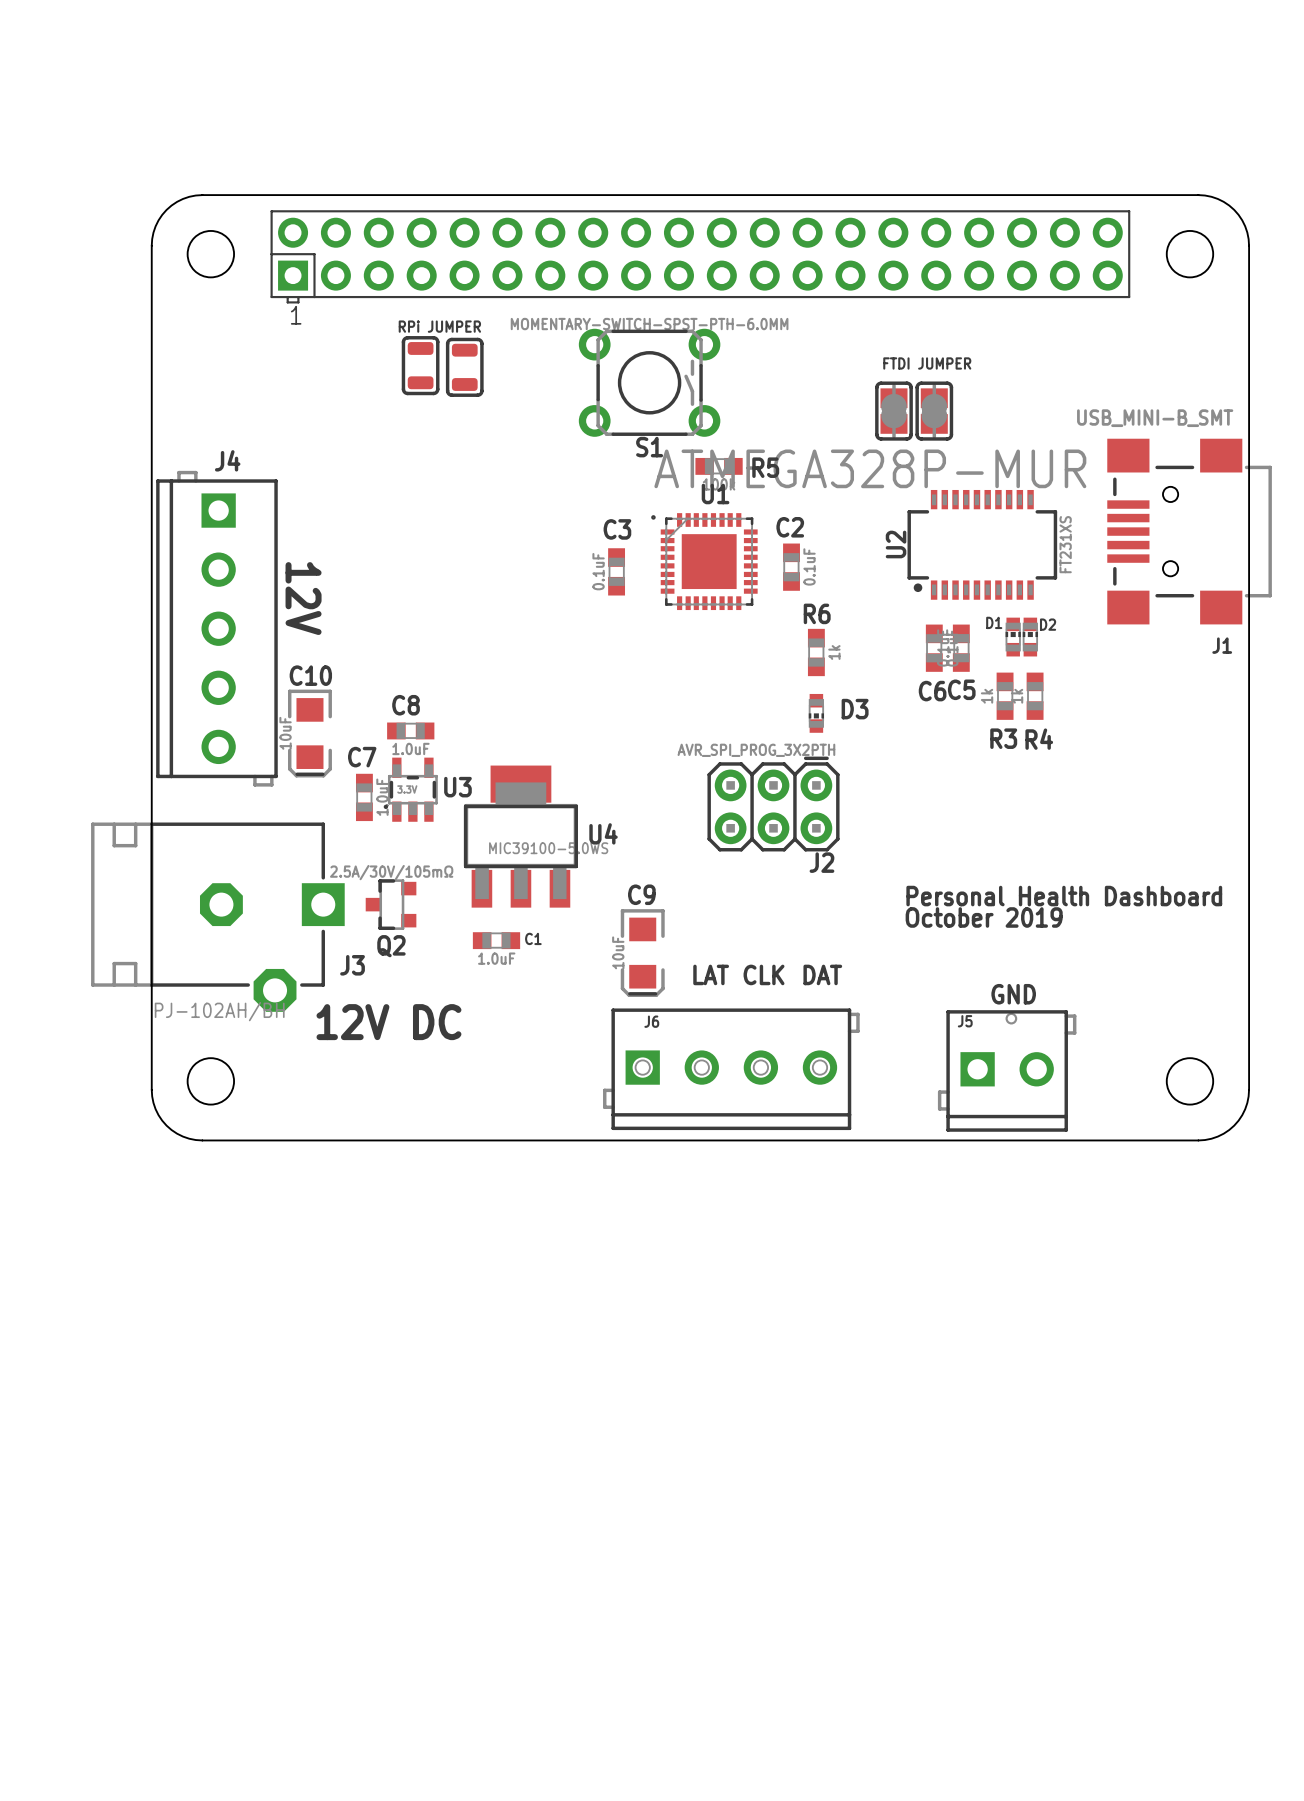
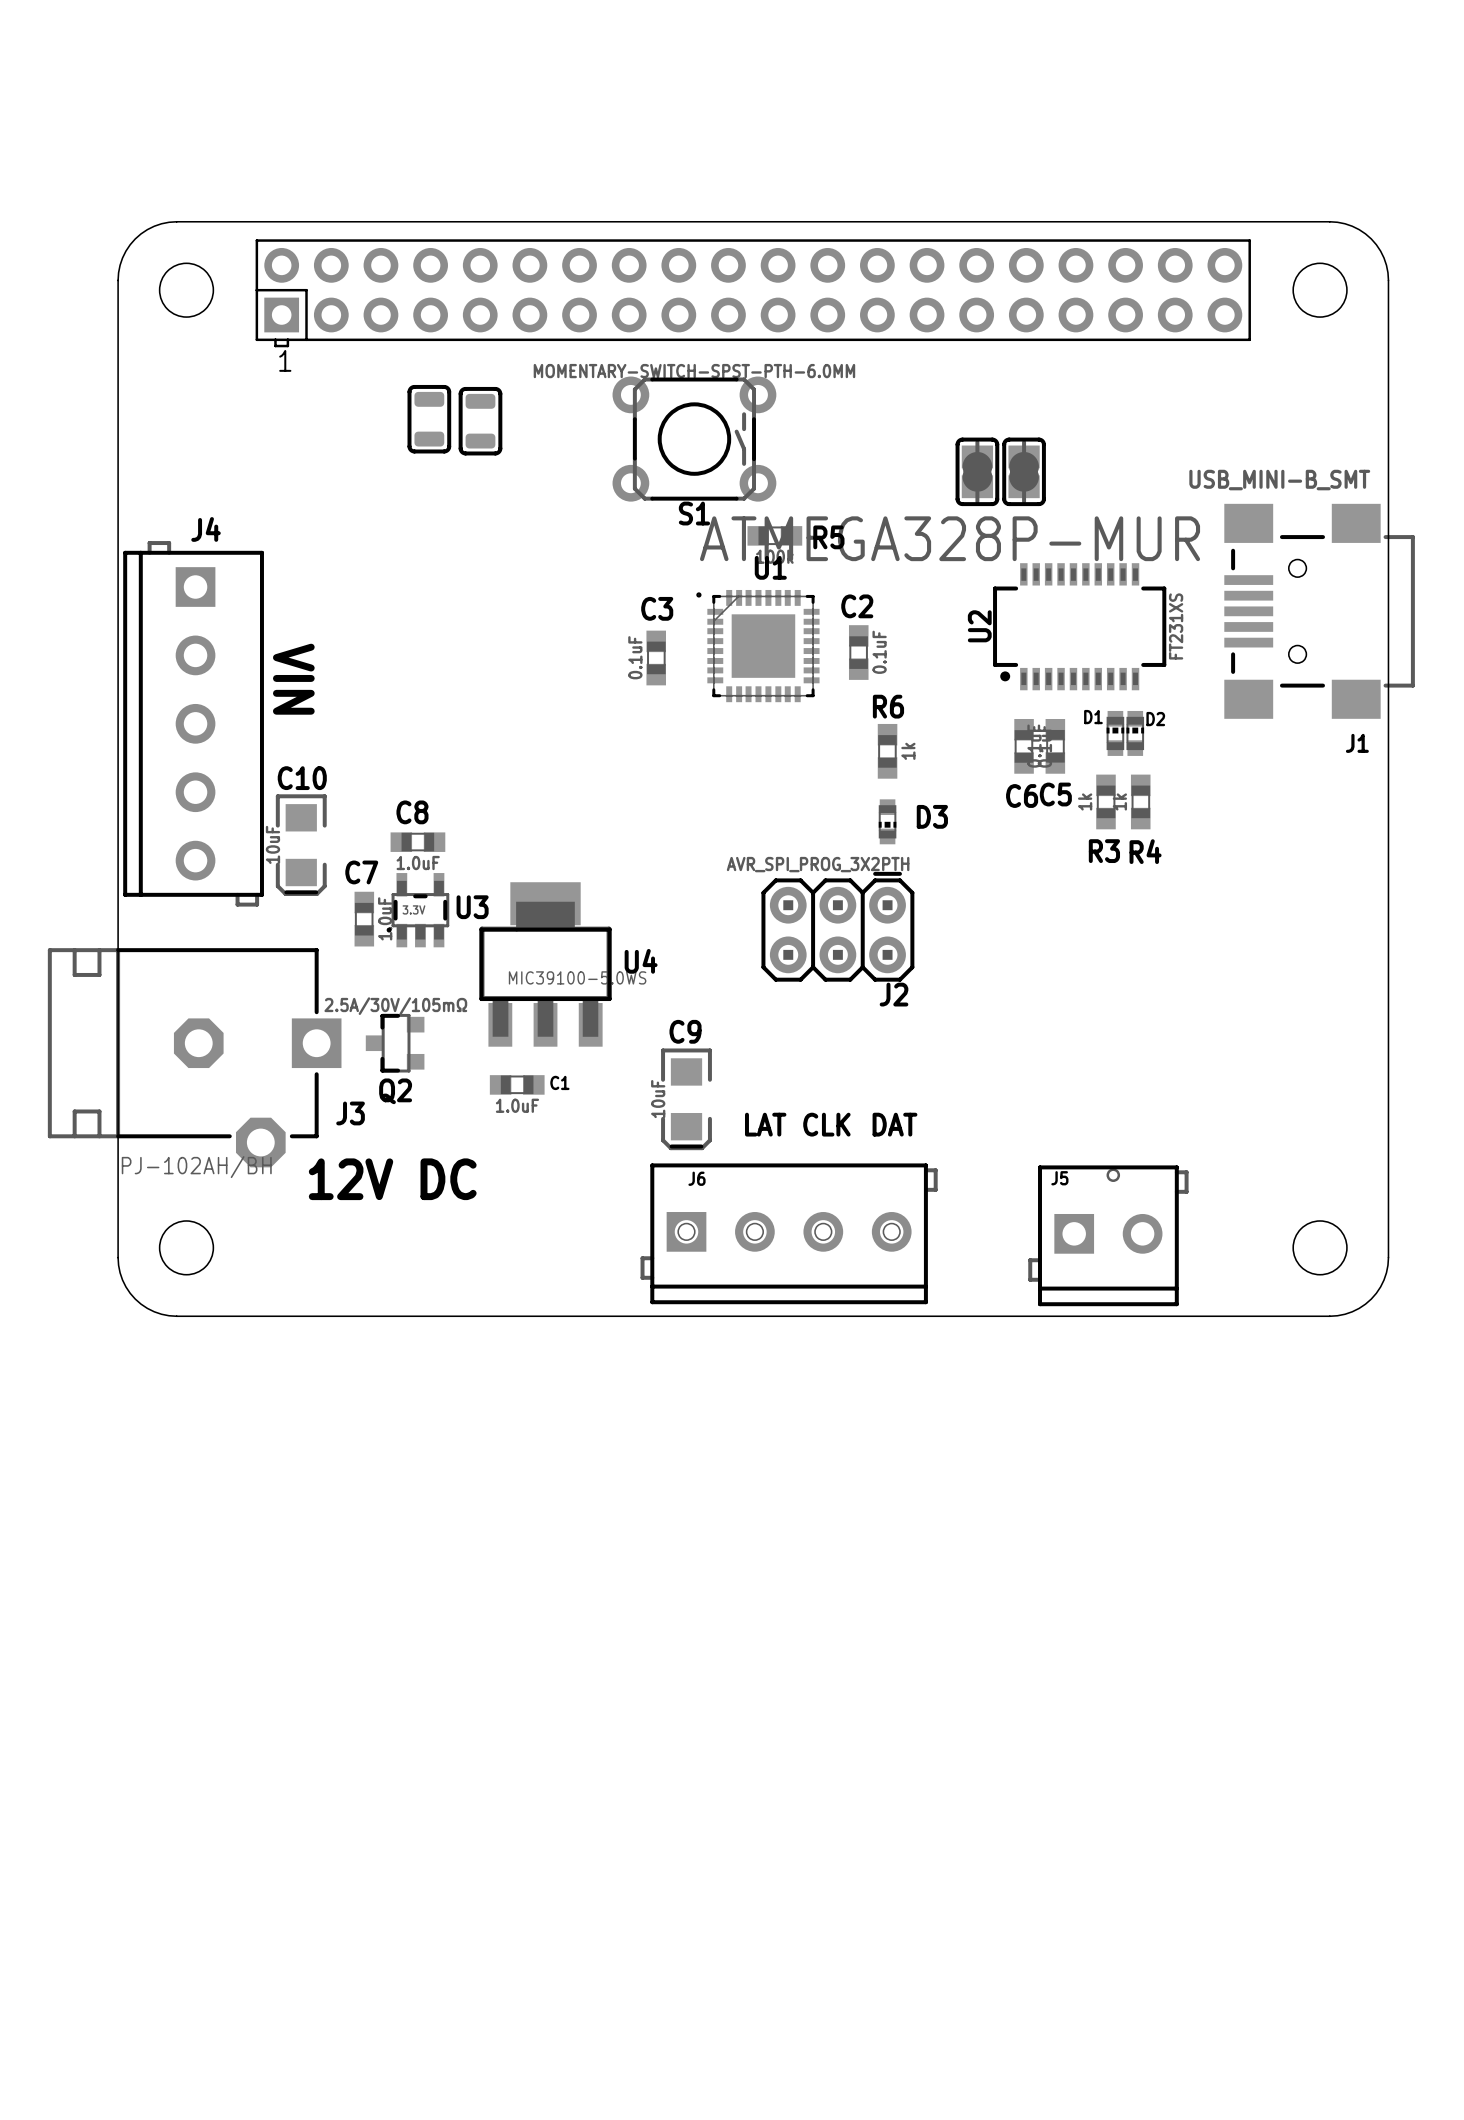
text: RPi JUMPER (439, 326) -> none
text: FTDI JUMPER (927, 363) -> none
text: 12V (303, 598) -> VIN (293, 679)
text: Personal Health Dashboard (1064, 896) -> none
text: October 2019 (984, 917) -> none
text: GND (1013, 994) -> none

